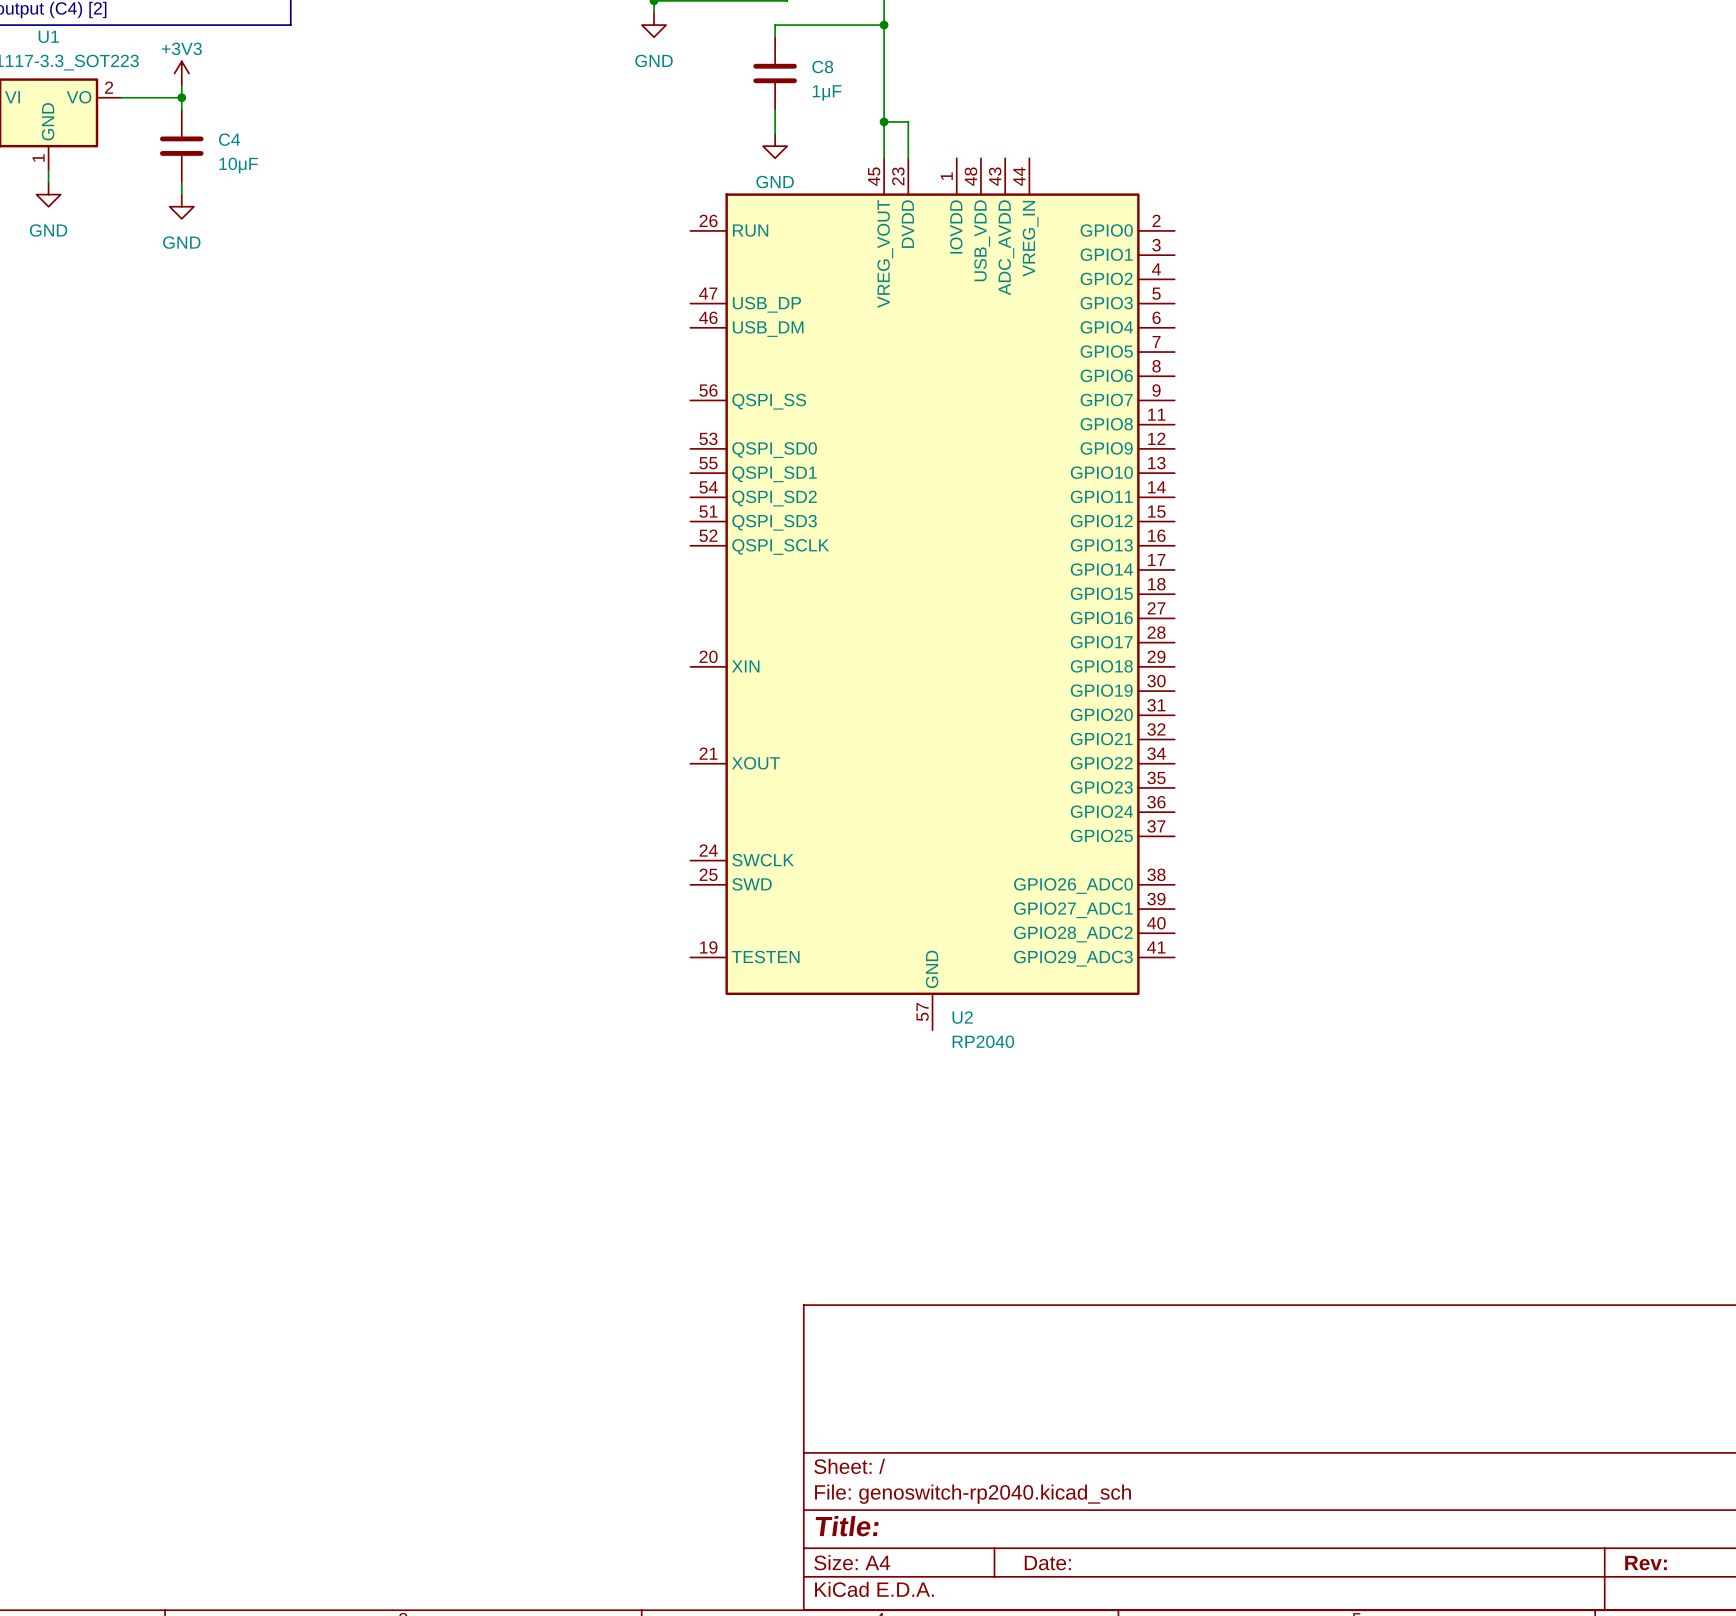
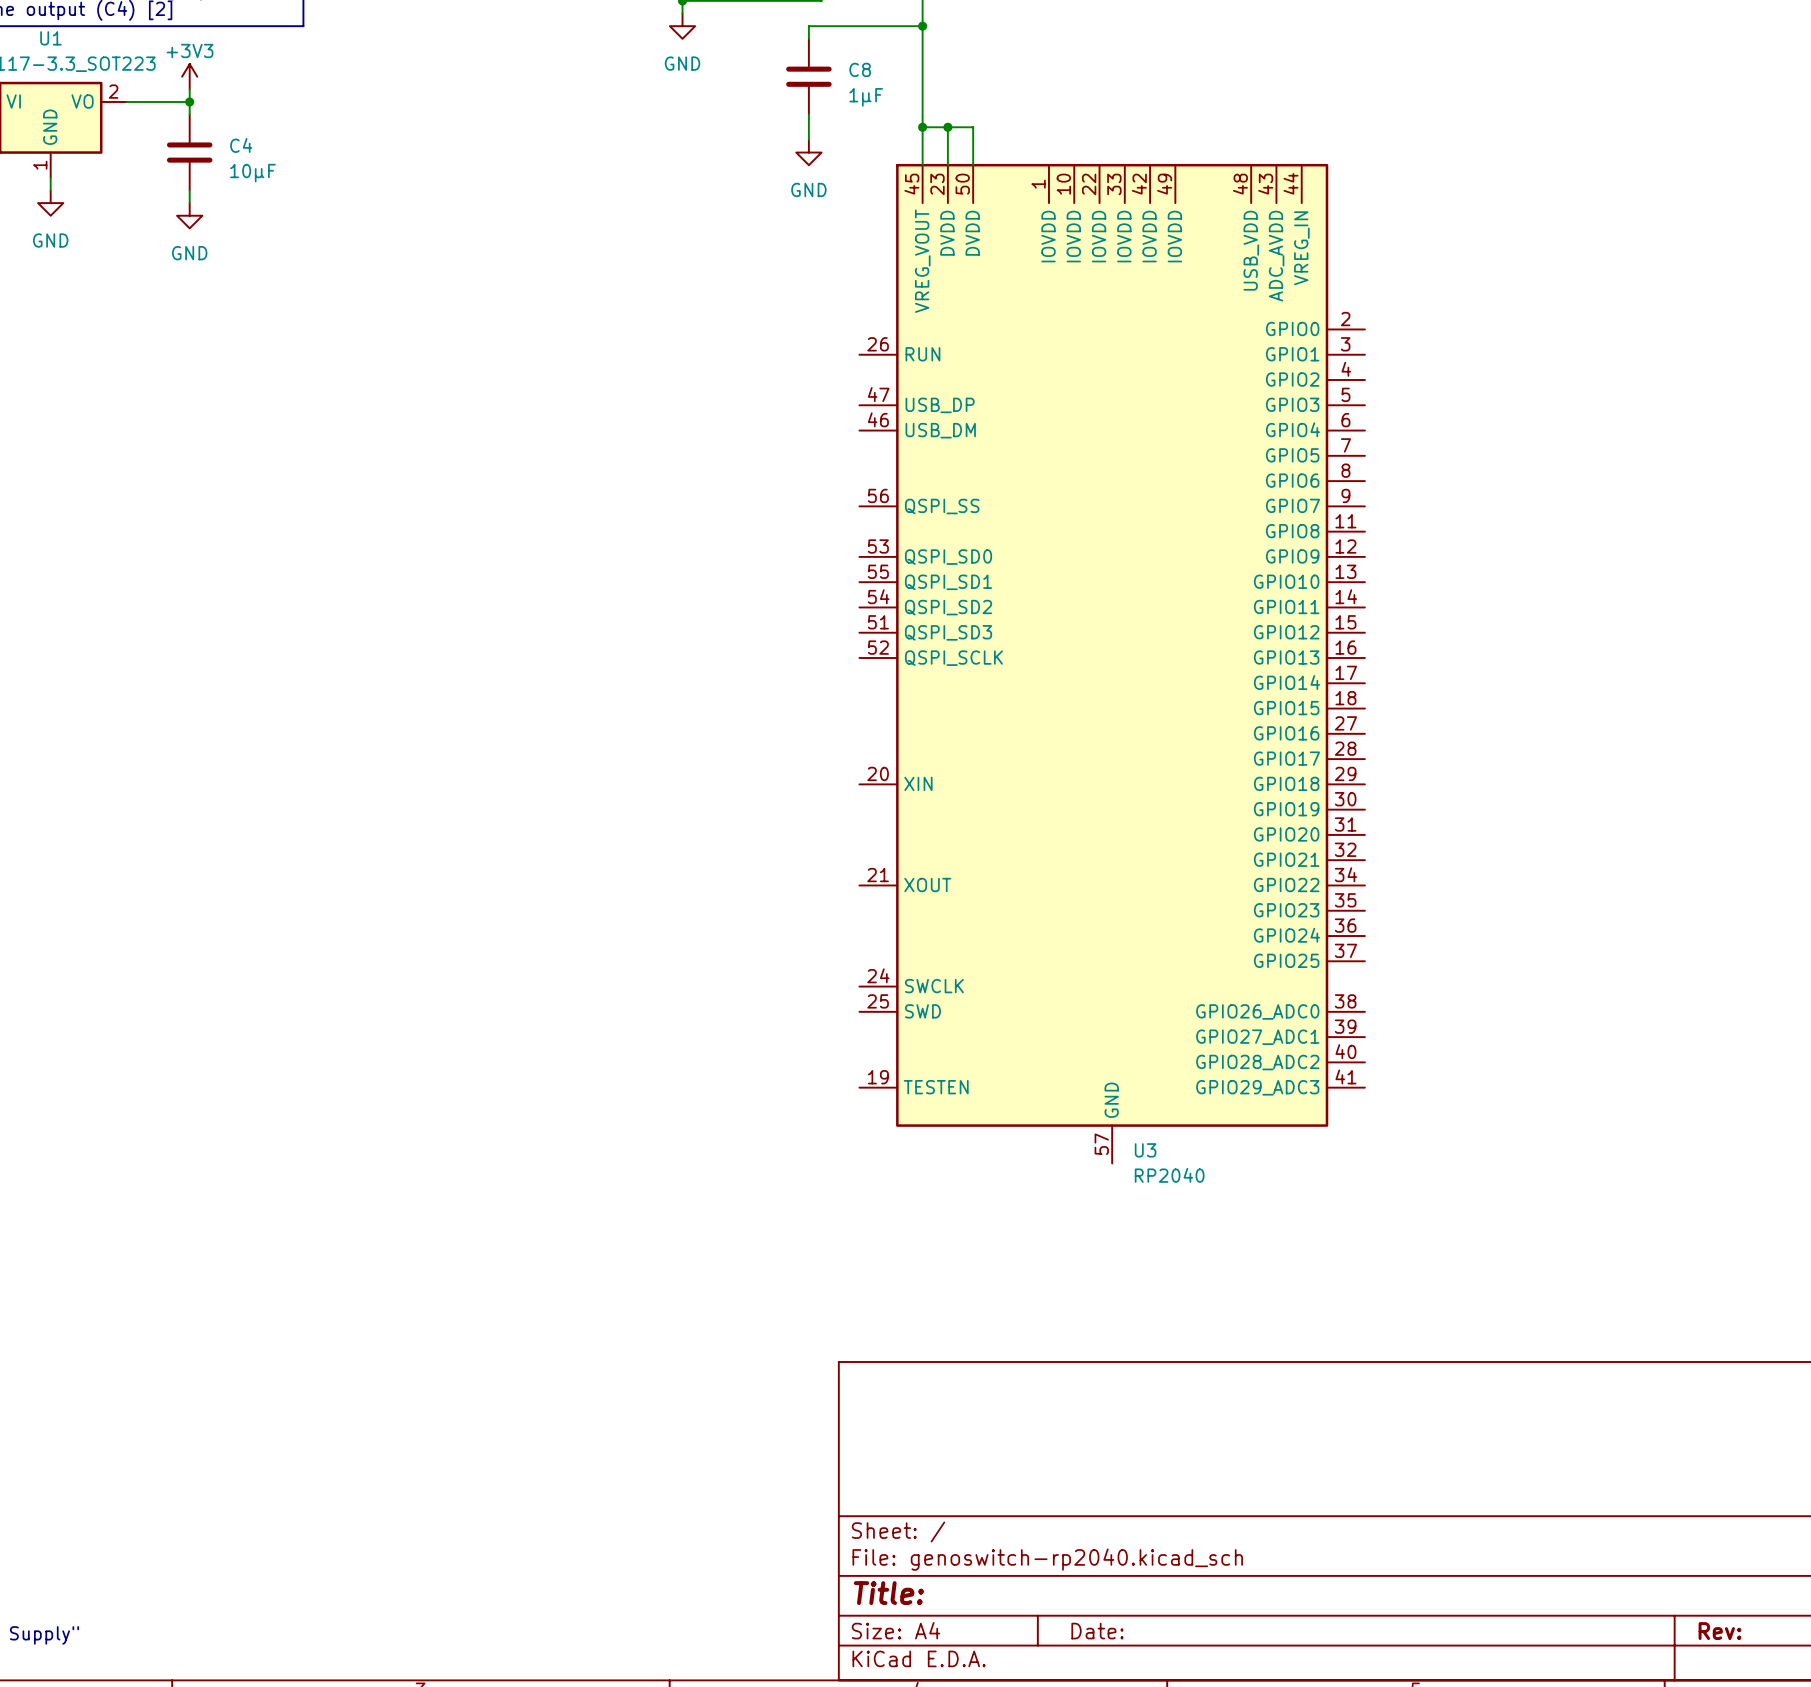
wire: none -> (947, 127) (973, 127) (973, 165)
junction: none -> (947, 127)
U2: RP2040 (932, 594) -> none
U3: none -> RP2040 (1112, 663)

